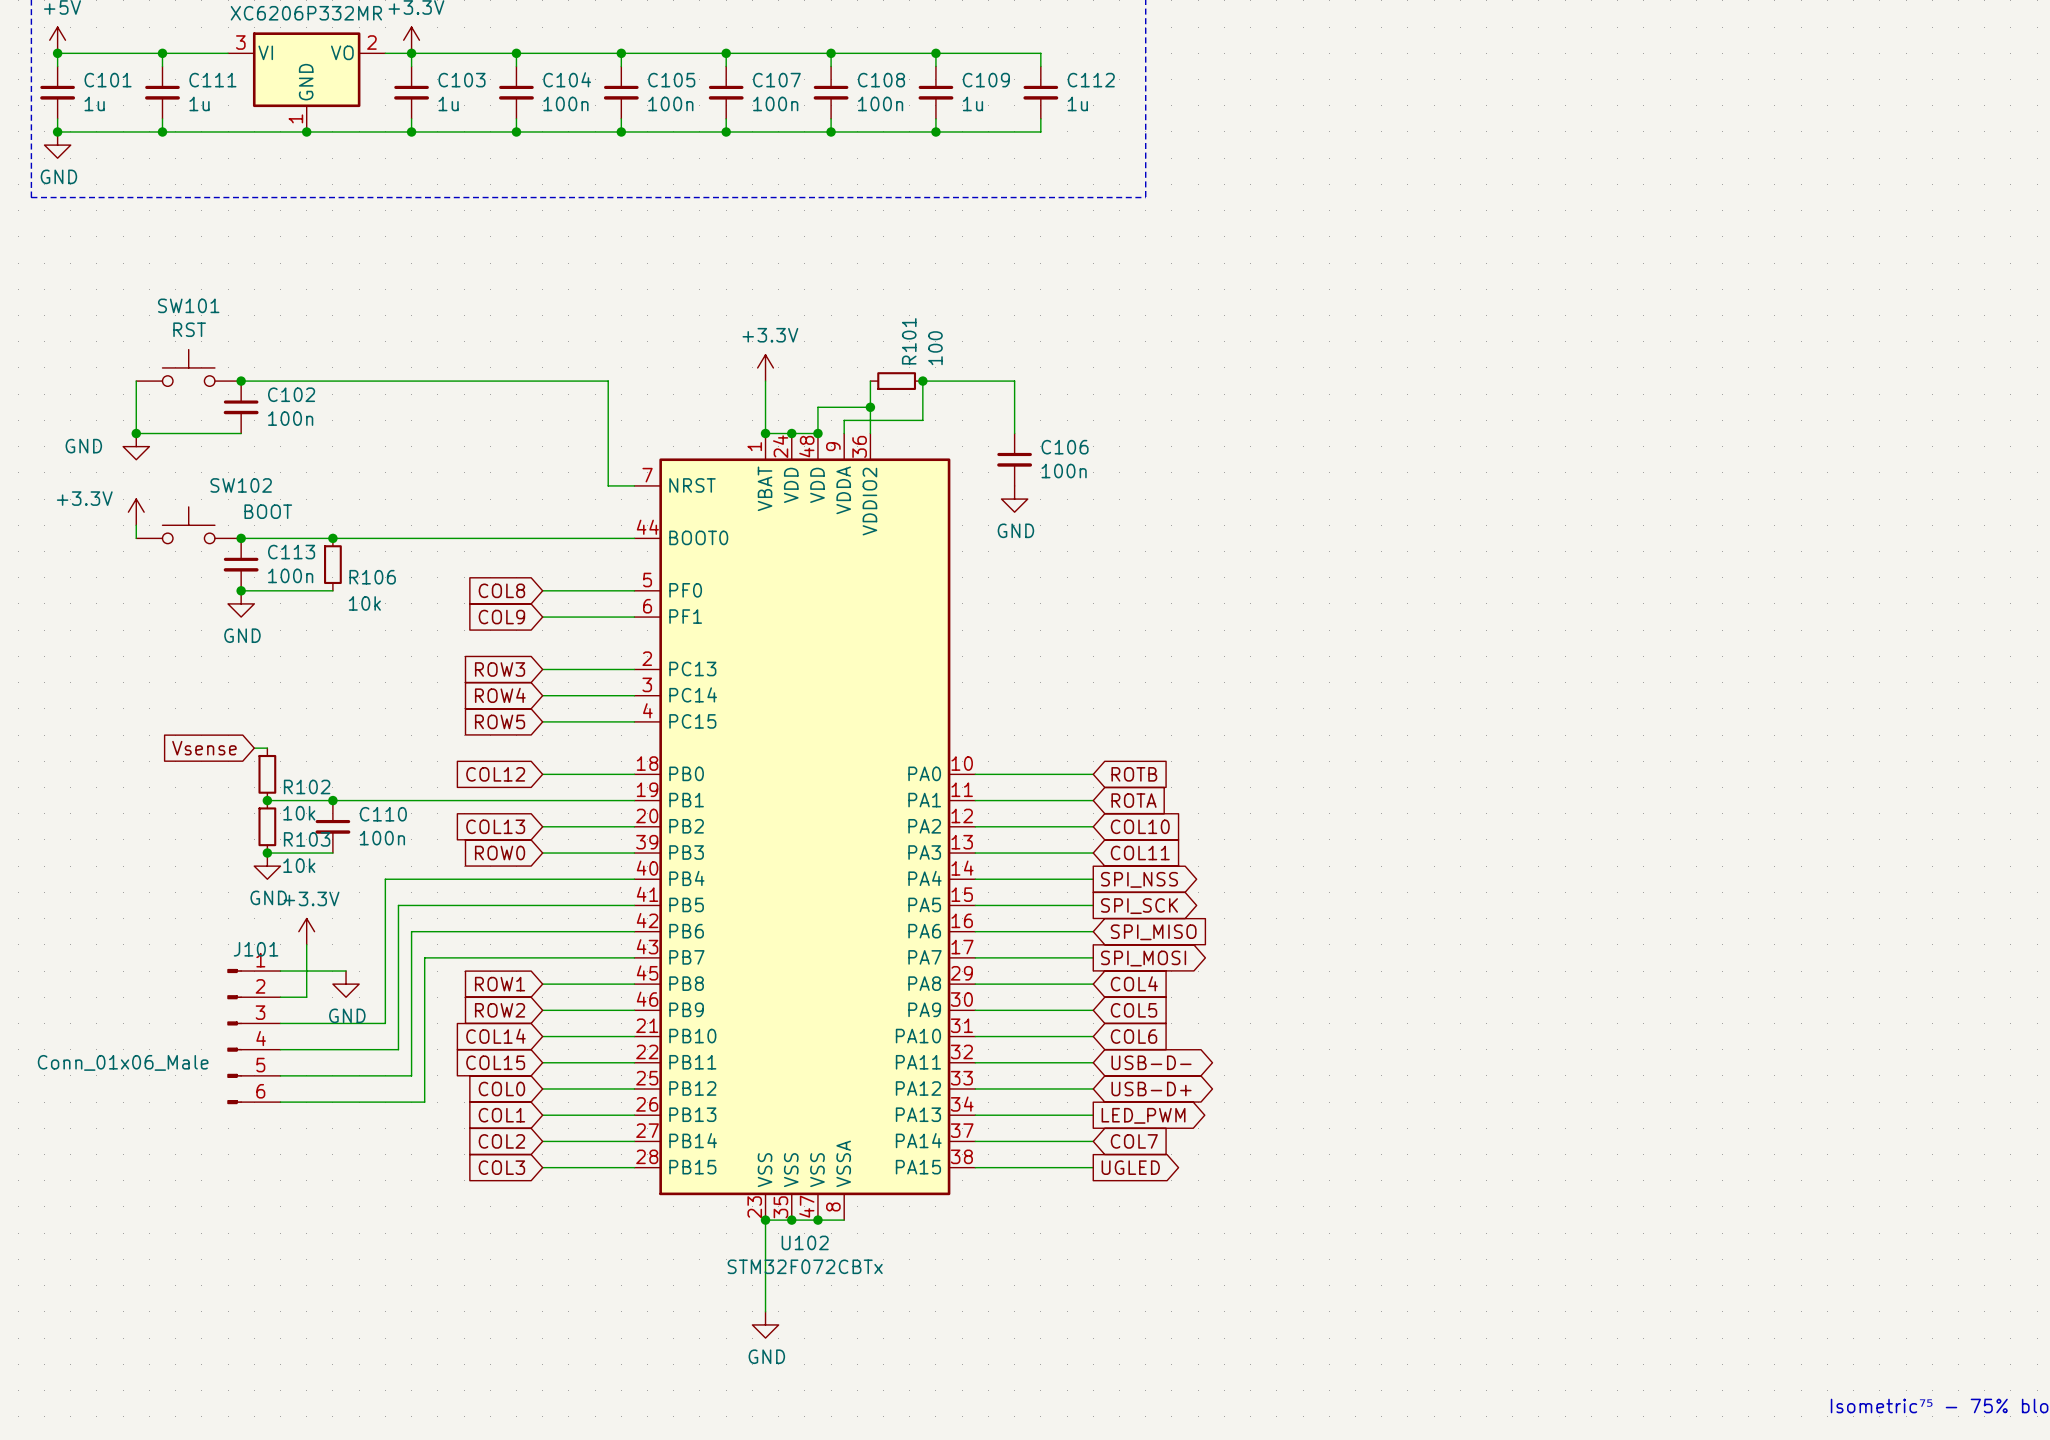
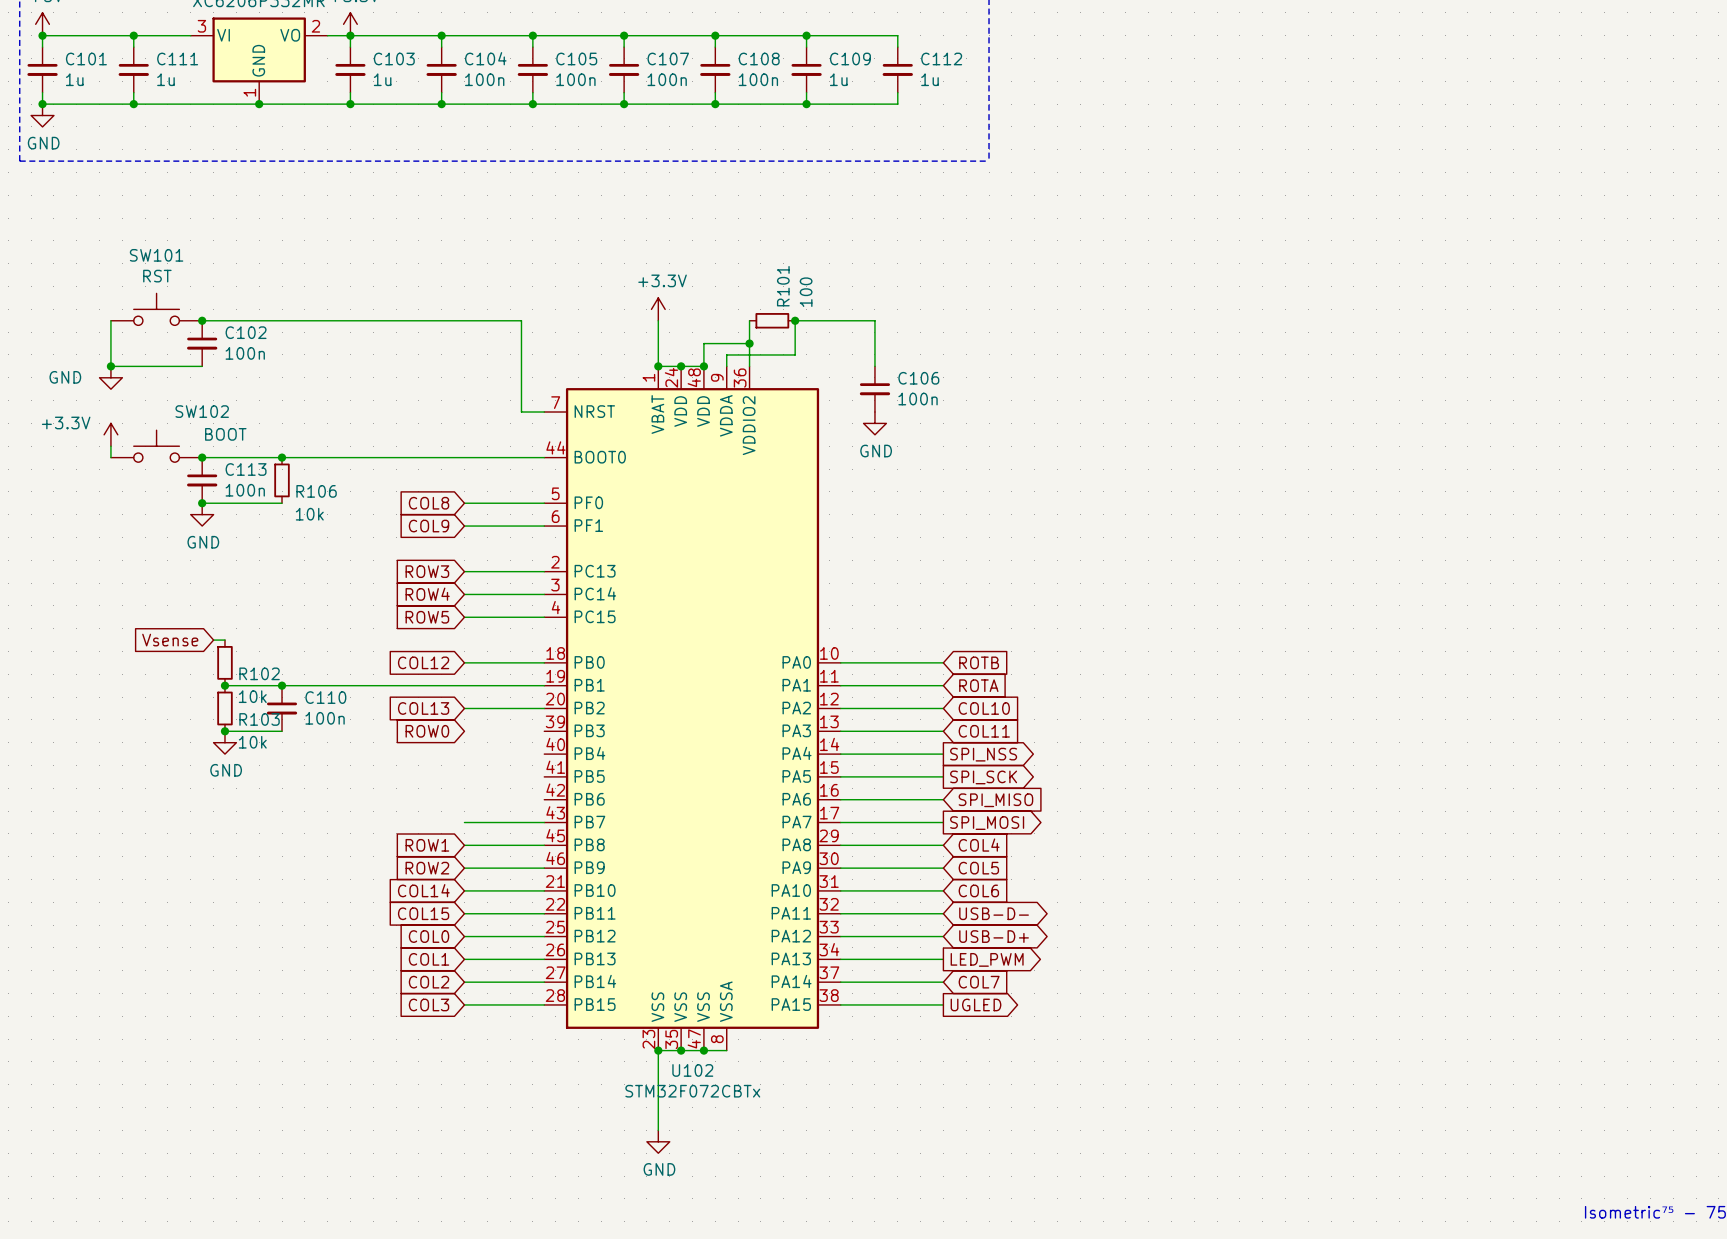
wire: (542, 853) (634, 853) -> none
wire: (634, 879) (385, 879) (385, 1023) (280, 1023) -> none
wire: (634, 905) (398, 905) (398, 1049) (280, 1049) -> none
power symbol: +3.3V (306, 931) -> none
wire: (634, 931) (411, 931) (411, 1075) (280, 1075) -> none
wire: (306, 944) (306, 997) (280, 997) -> none
wire: (542, 957) (424, 957) (424, 1102) (280, 1102) -> none
wire: (280, 971) (346, 971) -> none
power symbol: GND (346, 984) -> none
J101: Conn_01x06_Male (253, 1036) -> none

